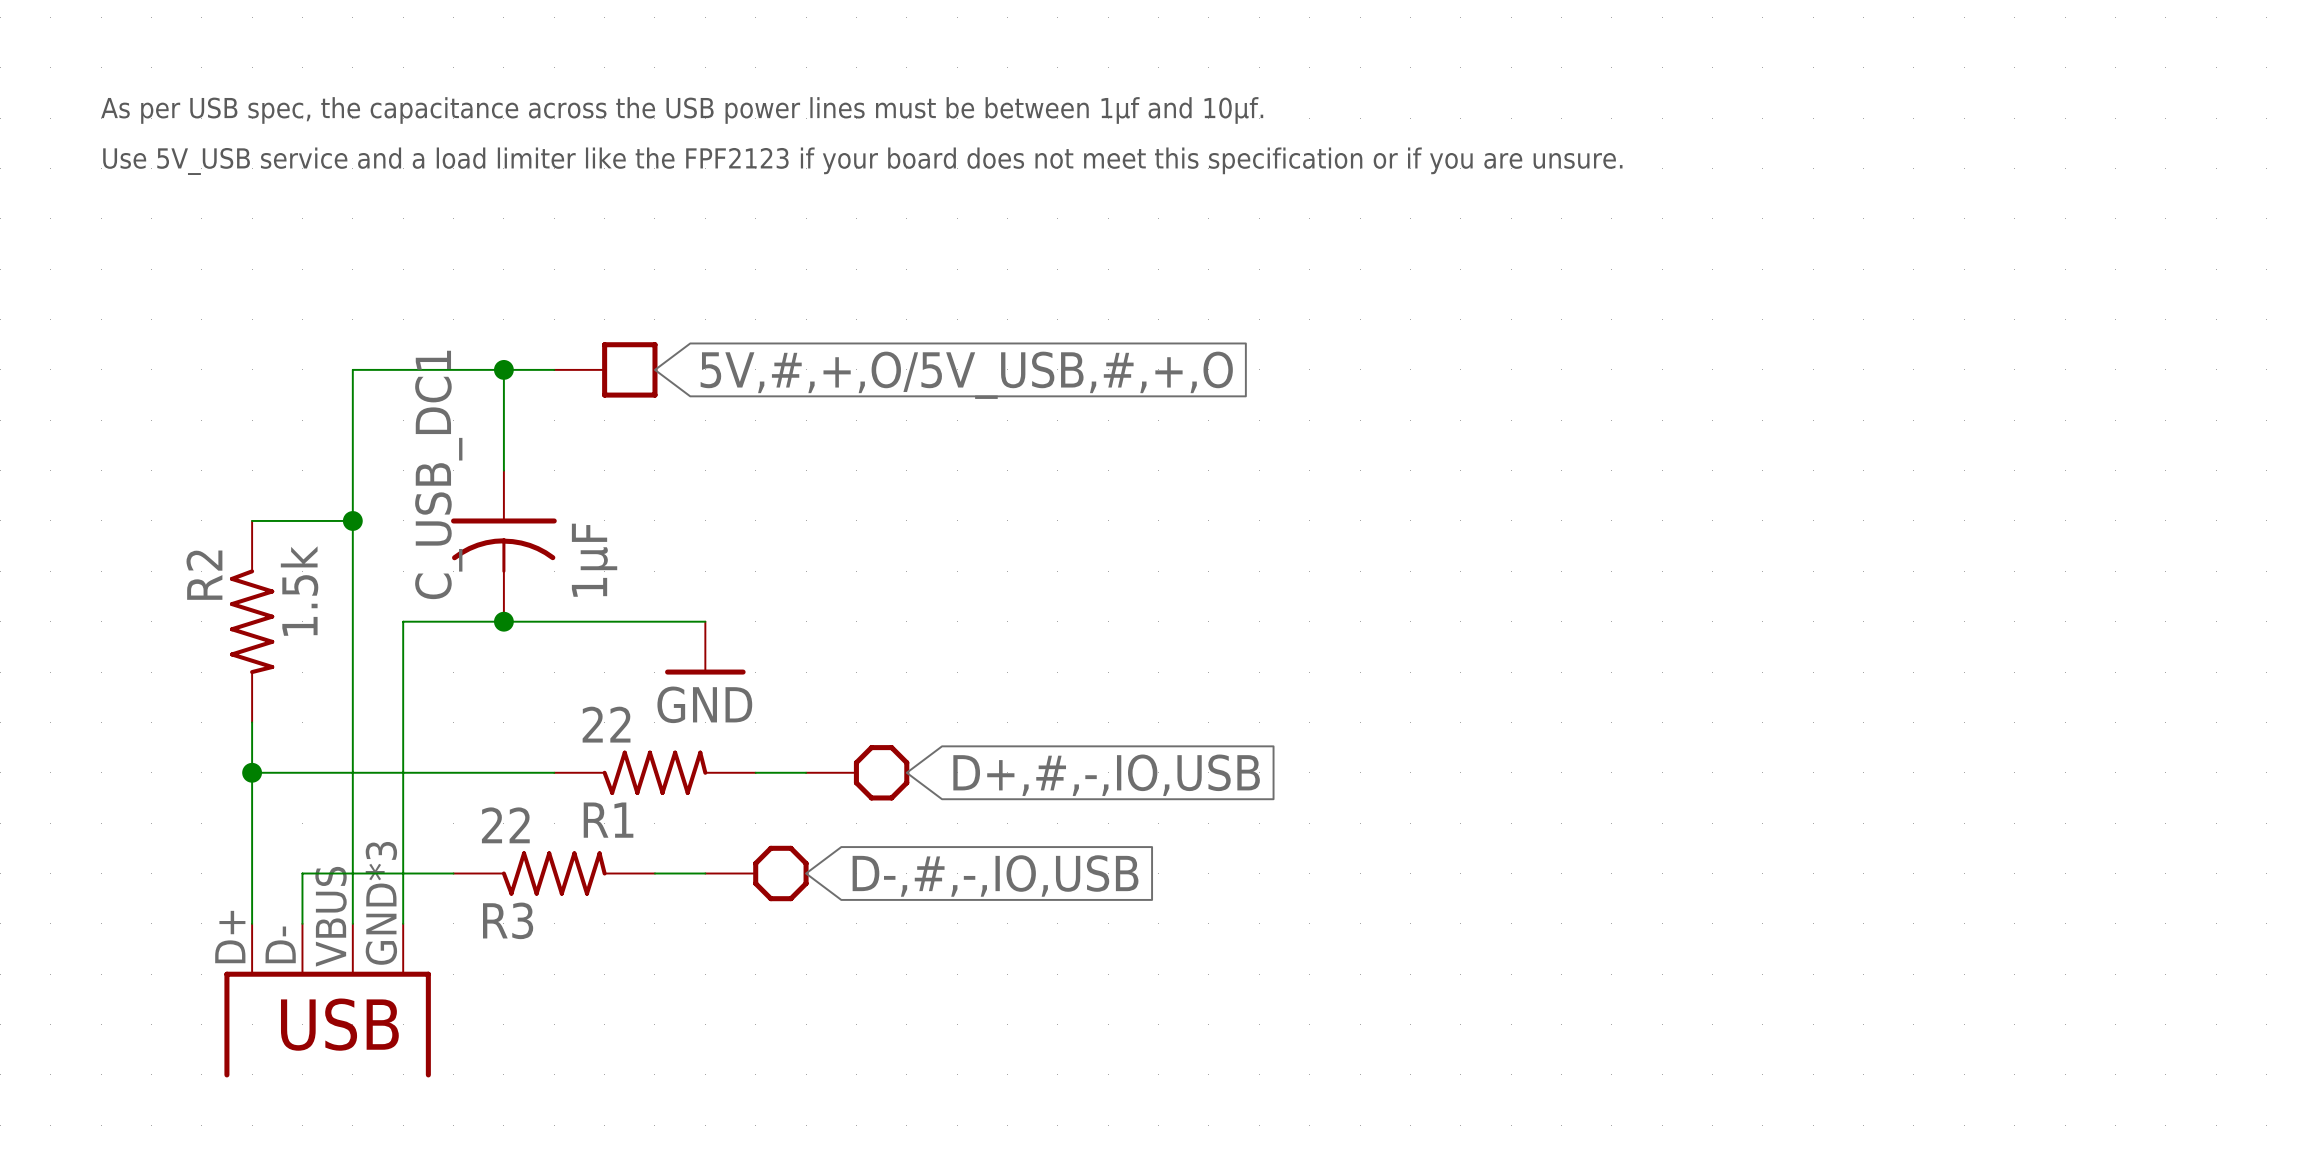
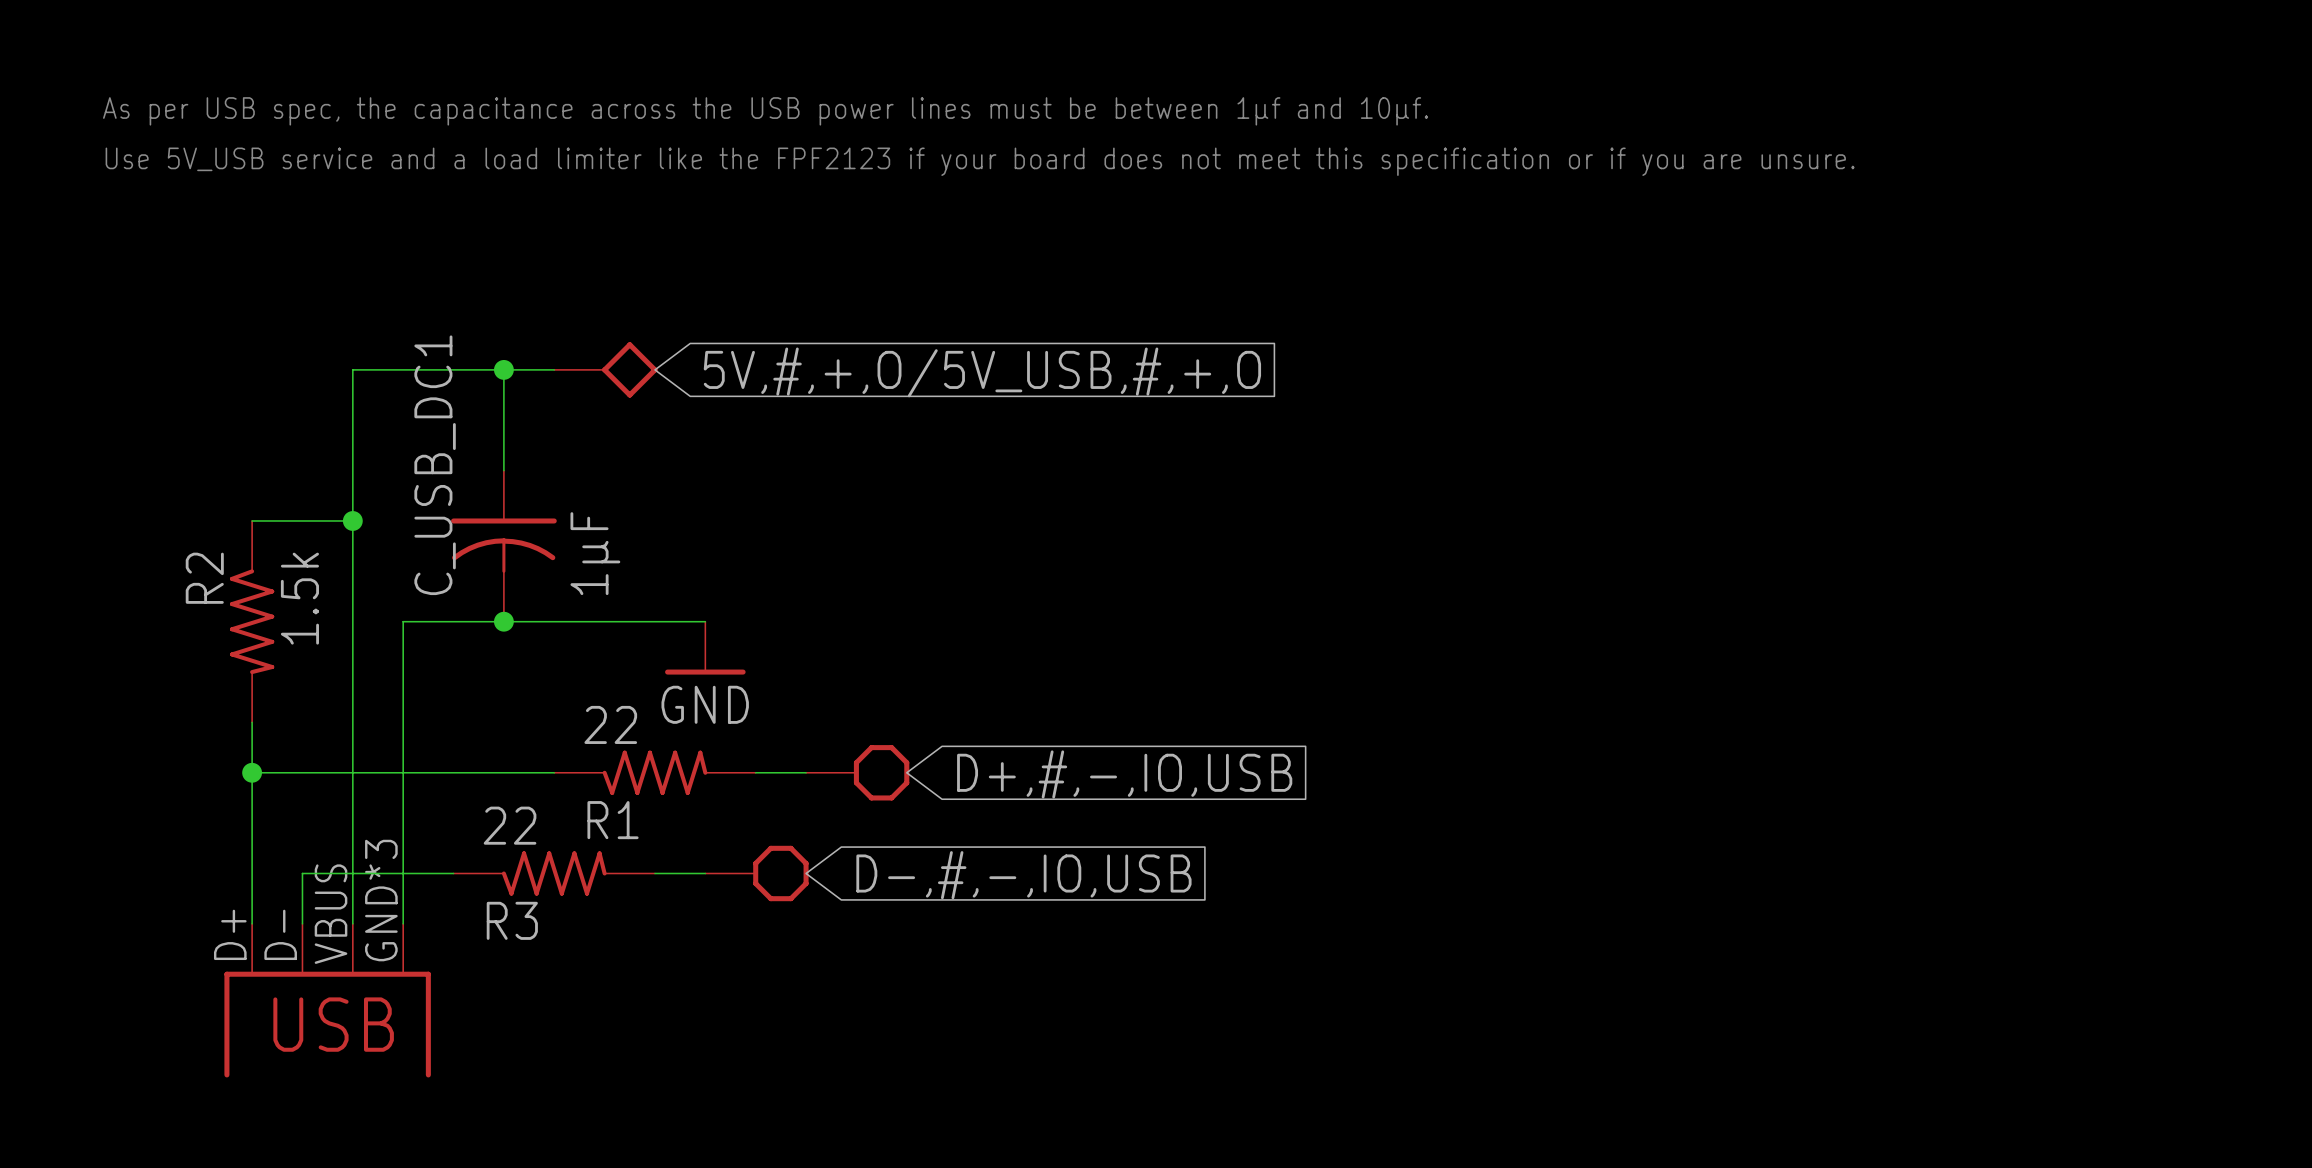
power symbol shape: [554, 342, 658, 398] -> [554, 342, 658, 398]

